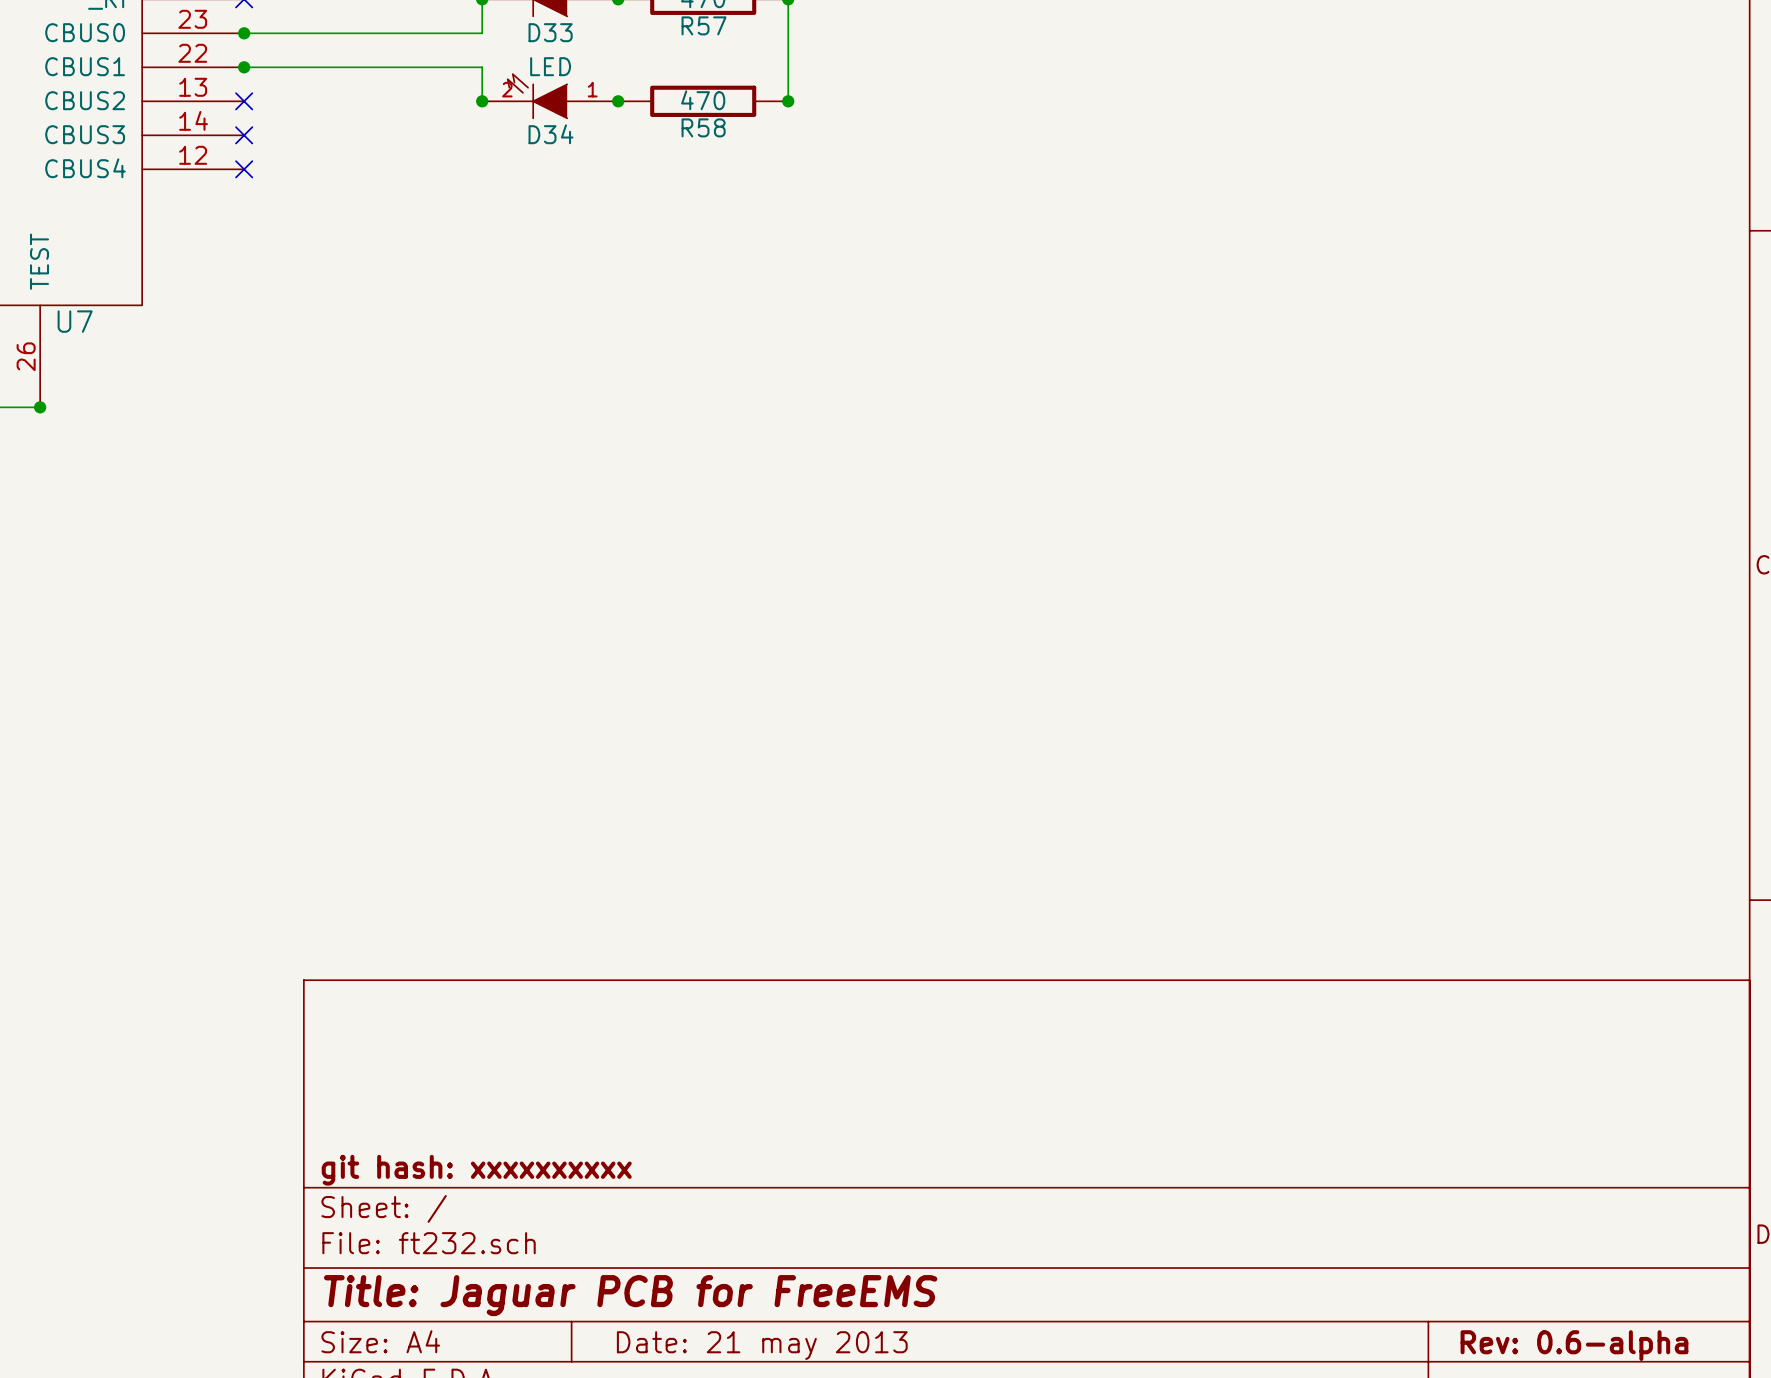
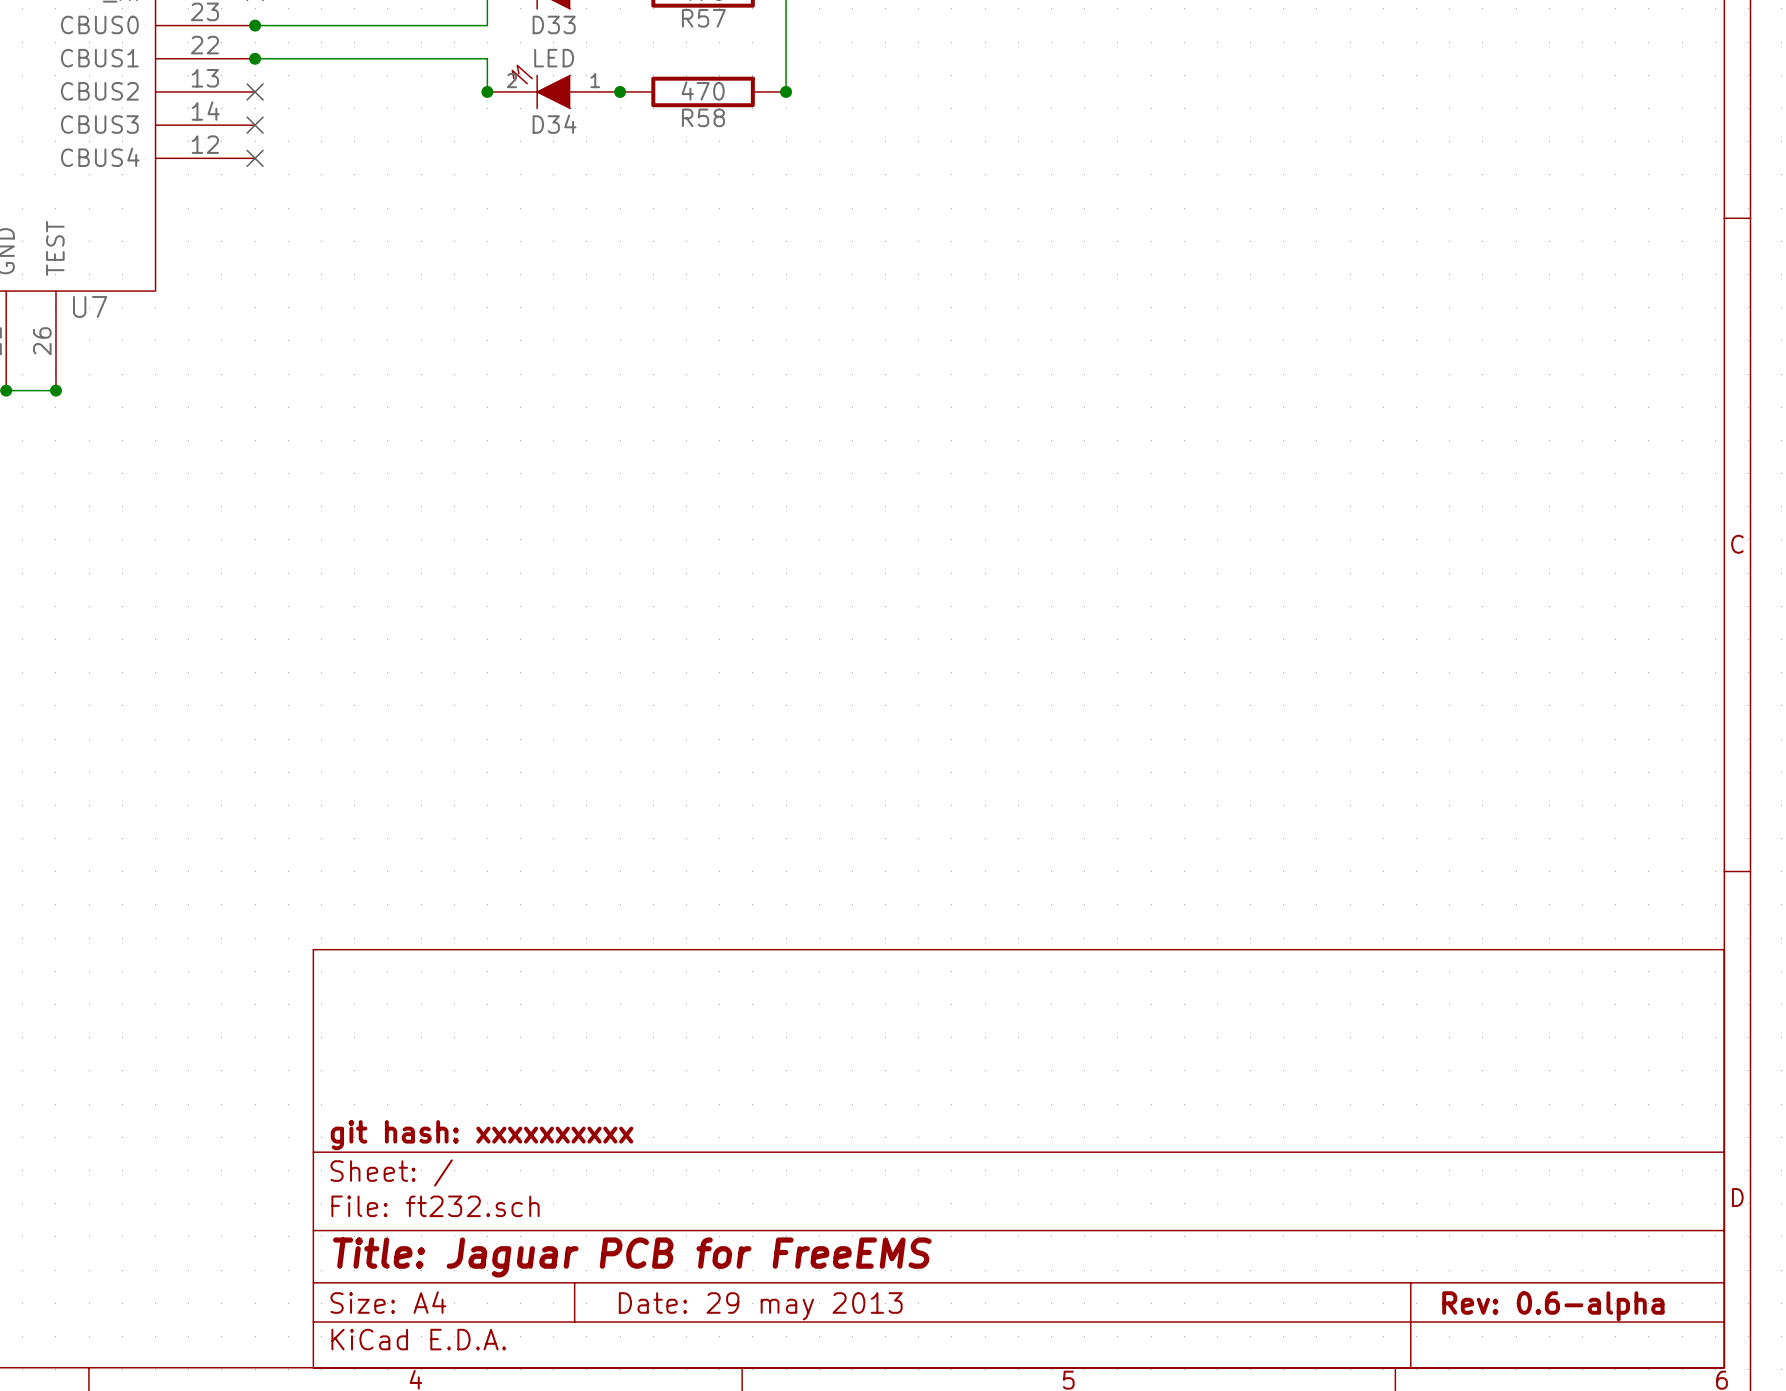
title block: Date: 21 may 2013 (762, 1345) -> Date: 29 may 2013 (760, 1306)

